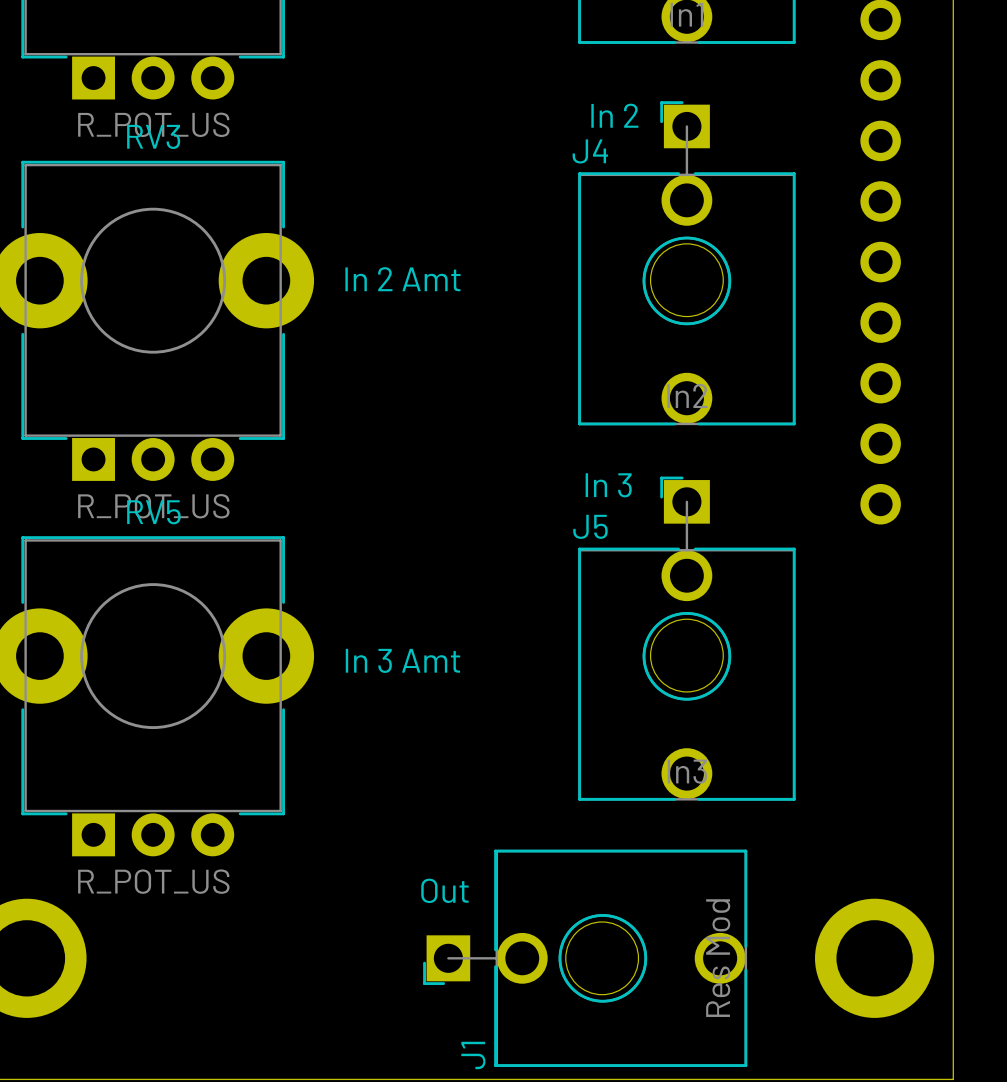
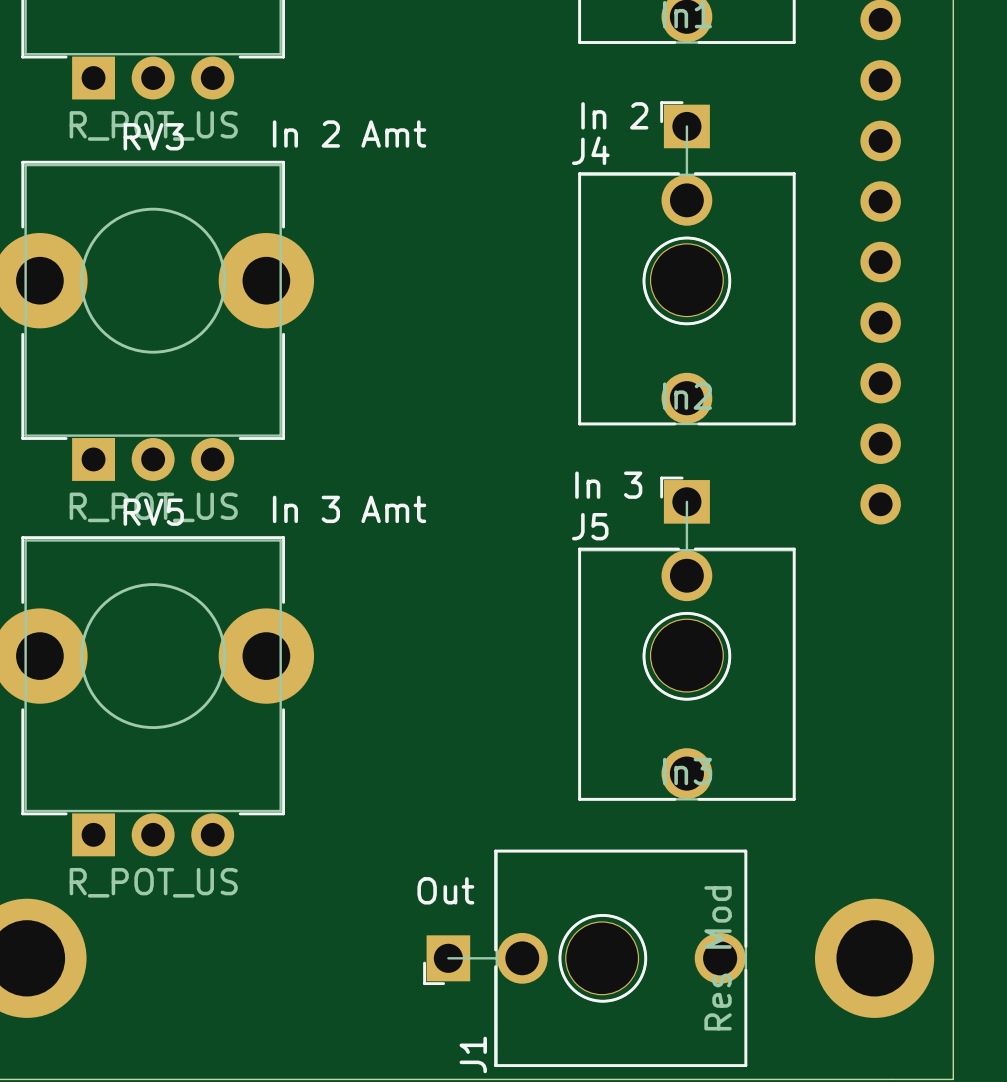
text position: In 2 Amt (402, 279) -> In 2 Amt (349, 134)
text position: In 3 Amt (402, 660) -> In 3 Amt (349, 509)

